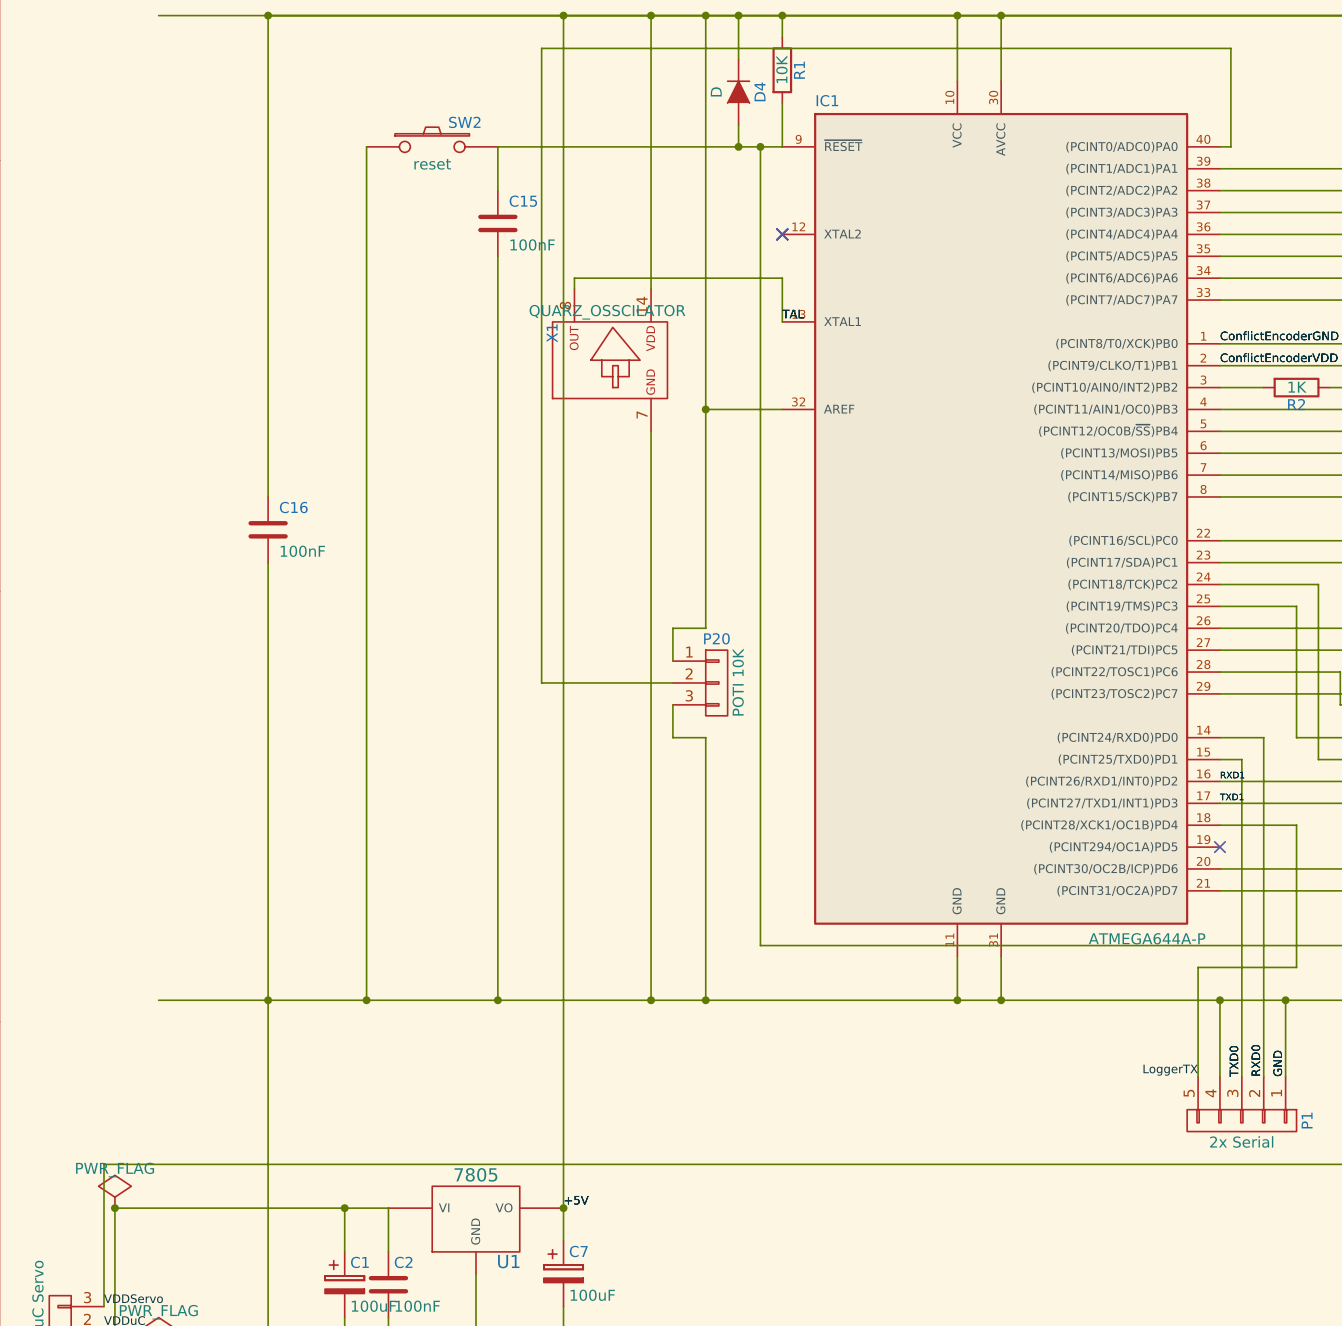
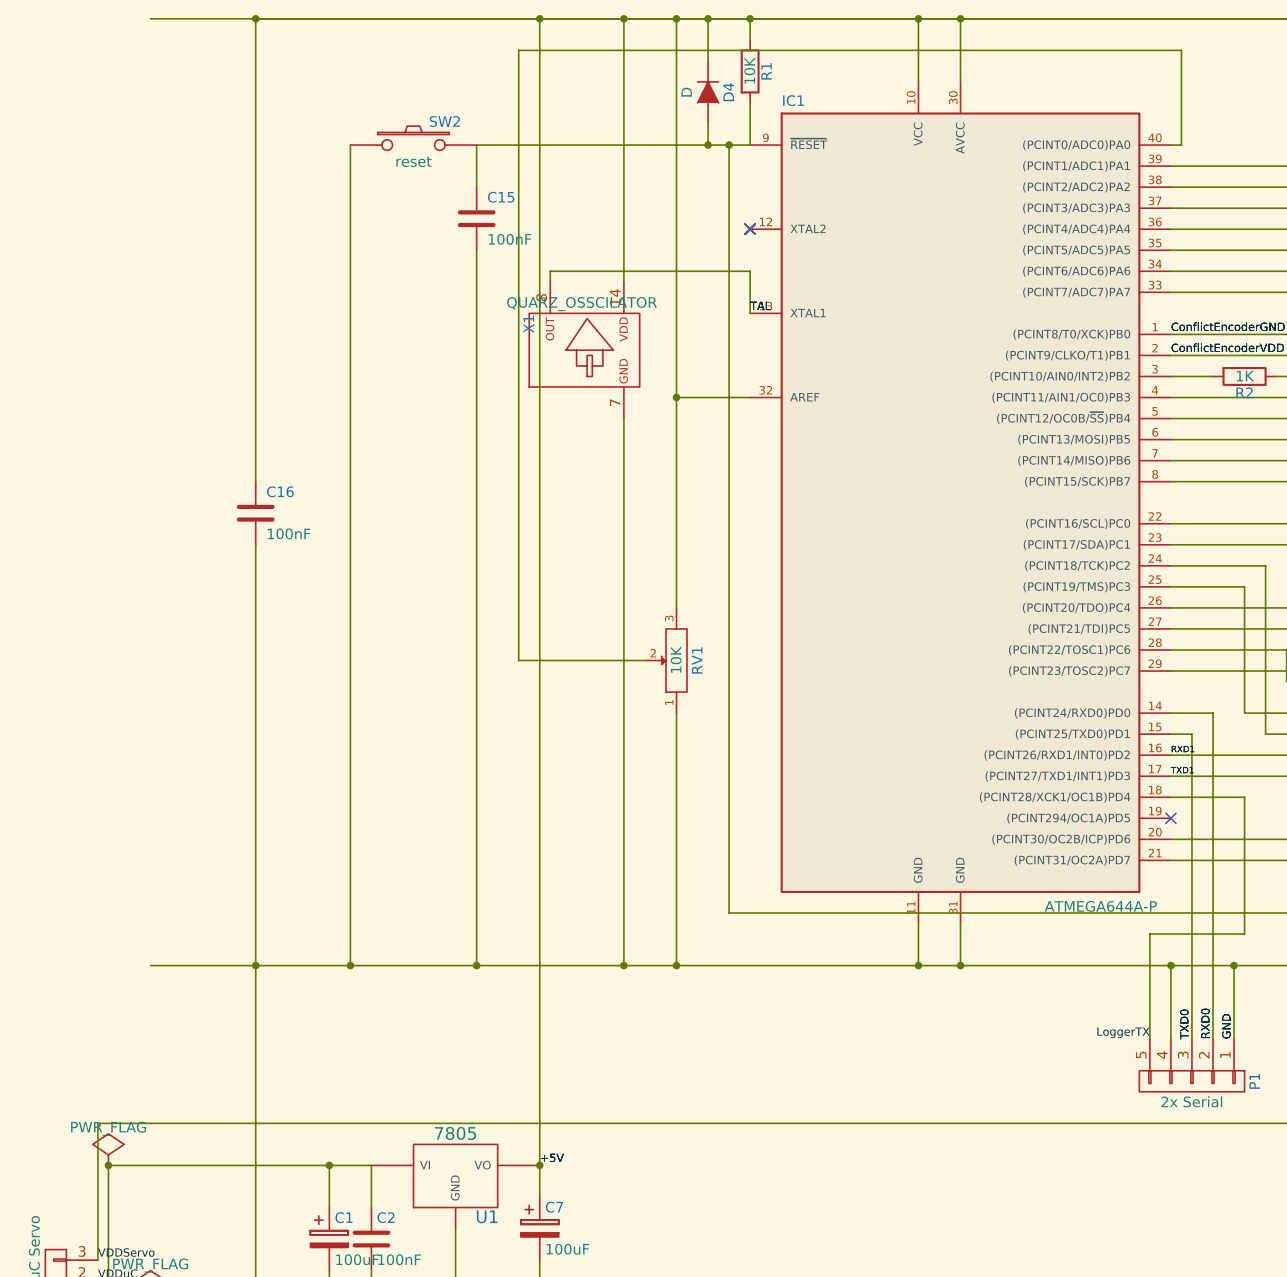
wire: (705, 628) (672, 628) (672, 661) -> none
RV1: none -> 10K (665, 660)
P20: POTI 10K (700, 682) -> none
wire: (672, 704) (672, 737) (705, 737) -> none

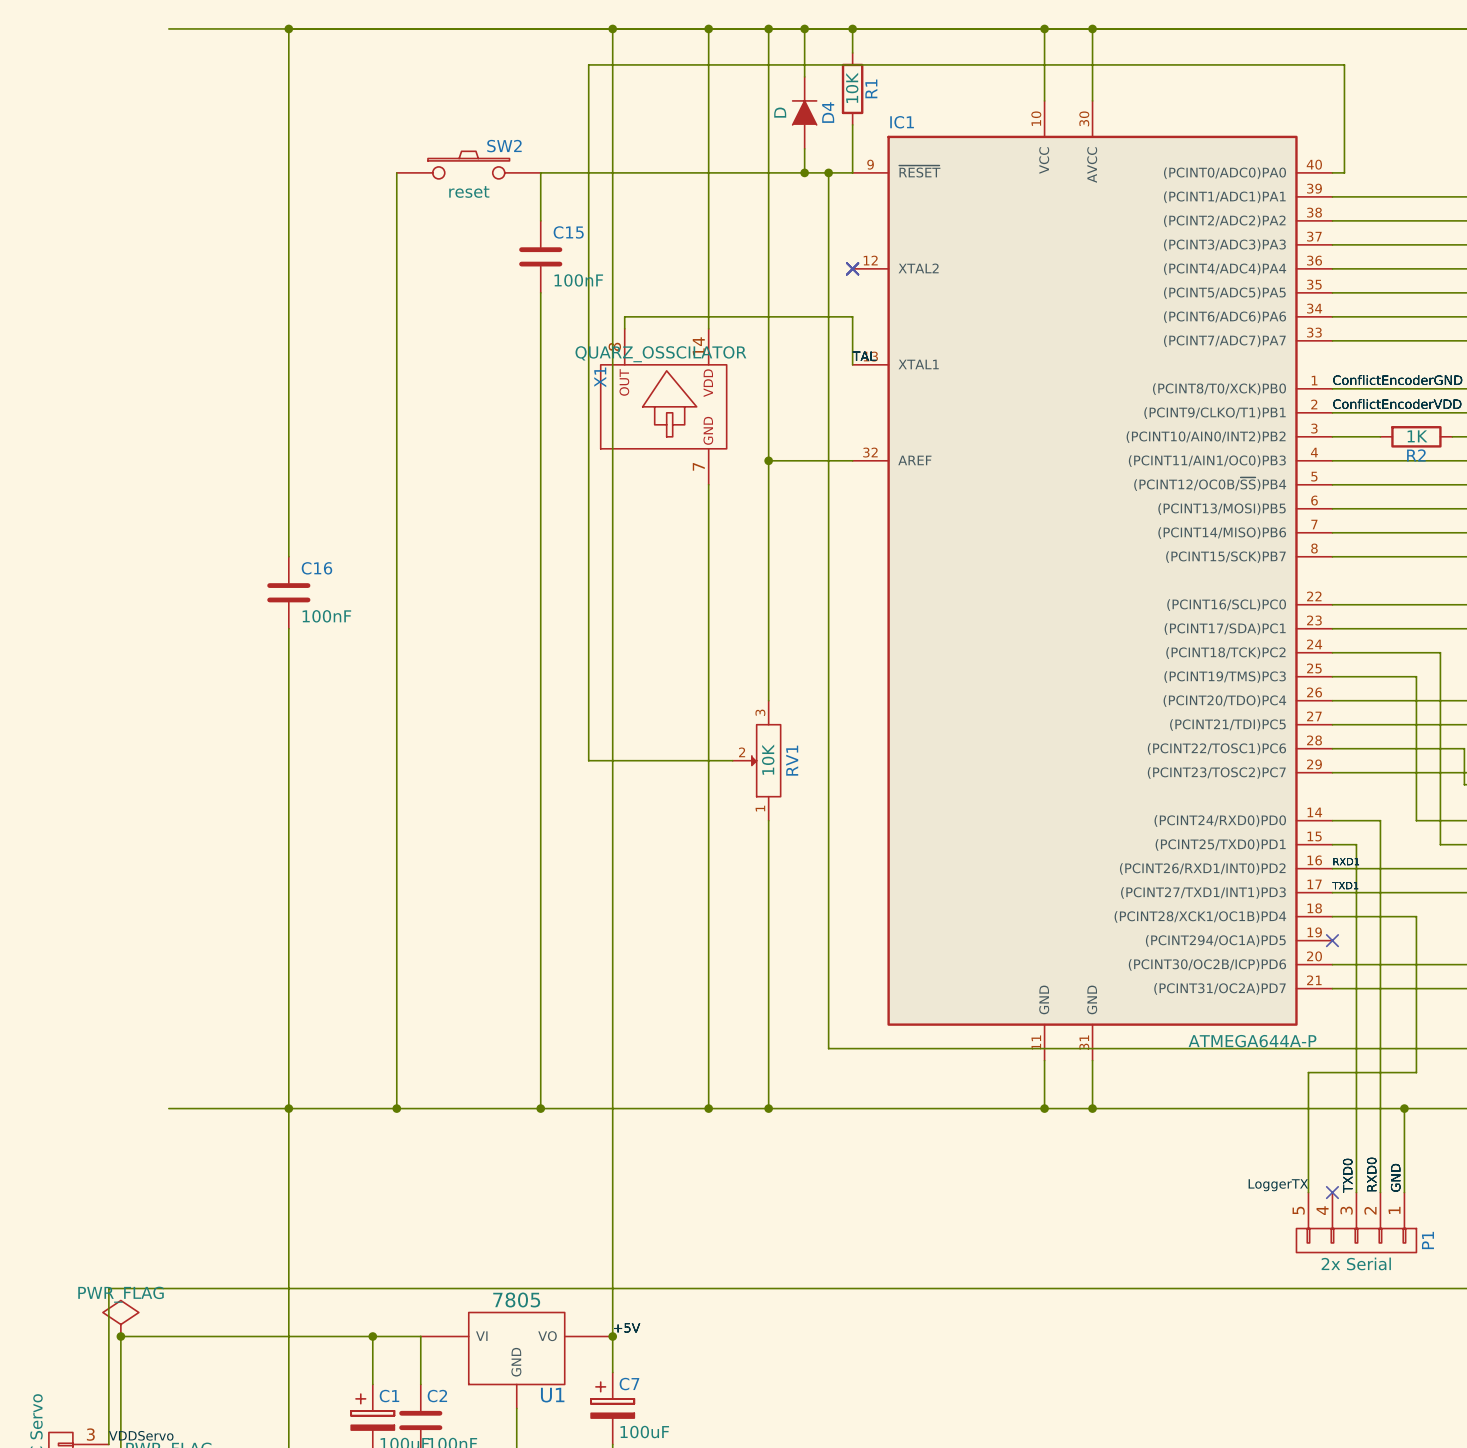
wire: (1170, 965) (1170, 1039) -> none
junction: (1170, 965) -> none
no-connect mark: none -> (1332, 1192)

